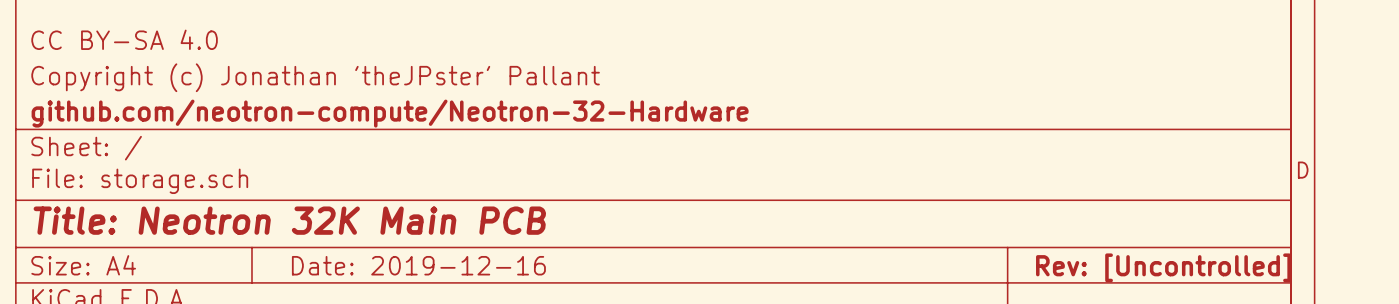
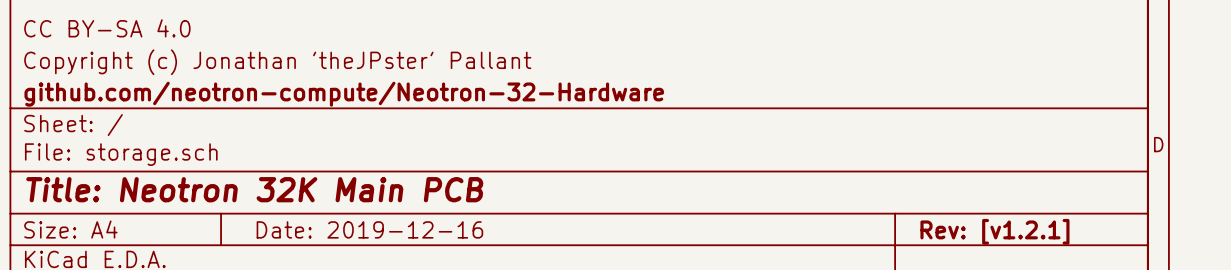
title block: Rev: [Uncontrolled] (1163, 267) -> Rev: [v1.2.1] (994, 231)

